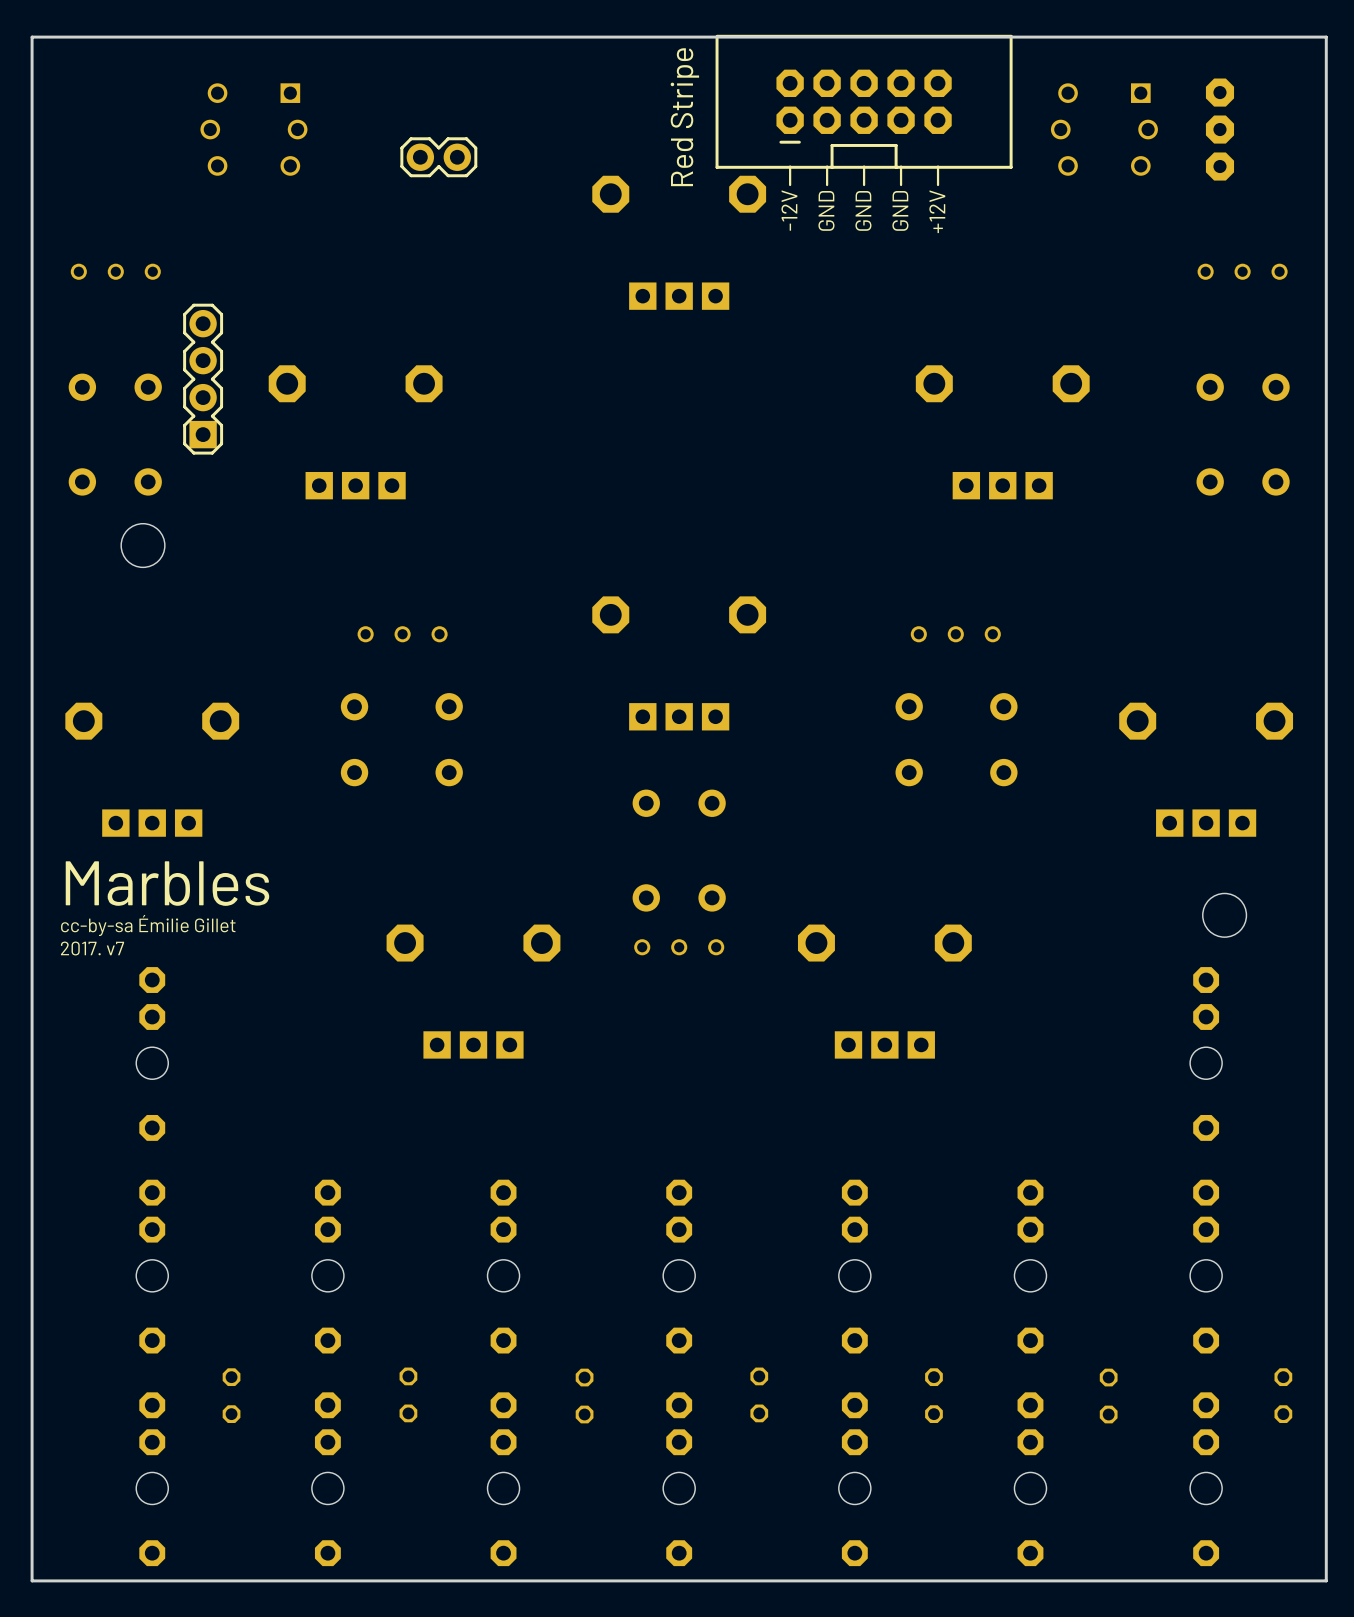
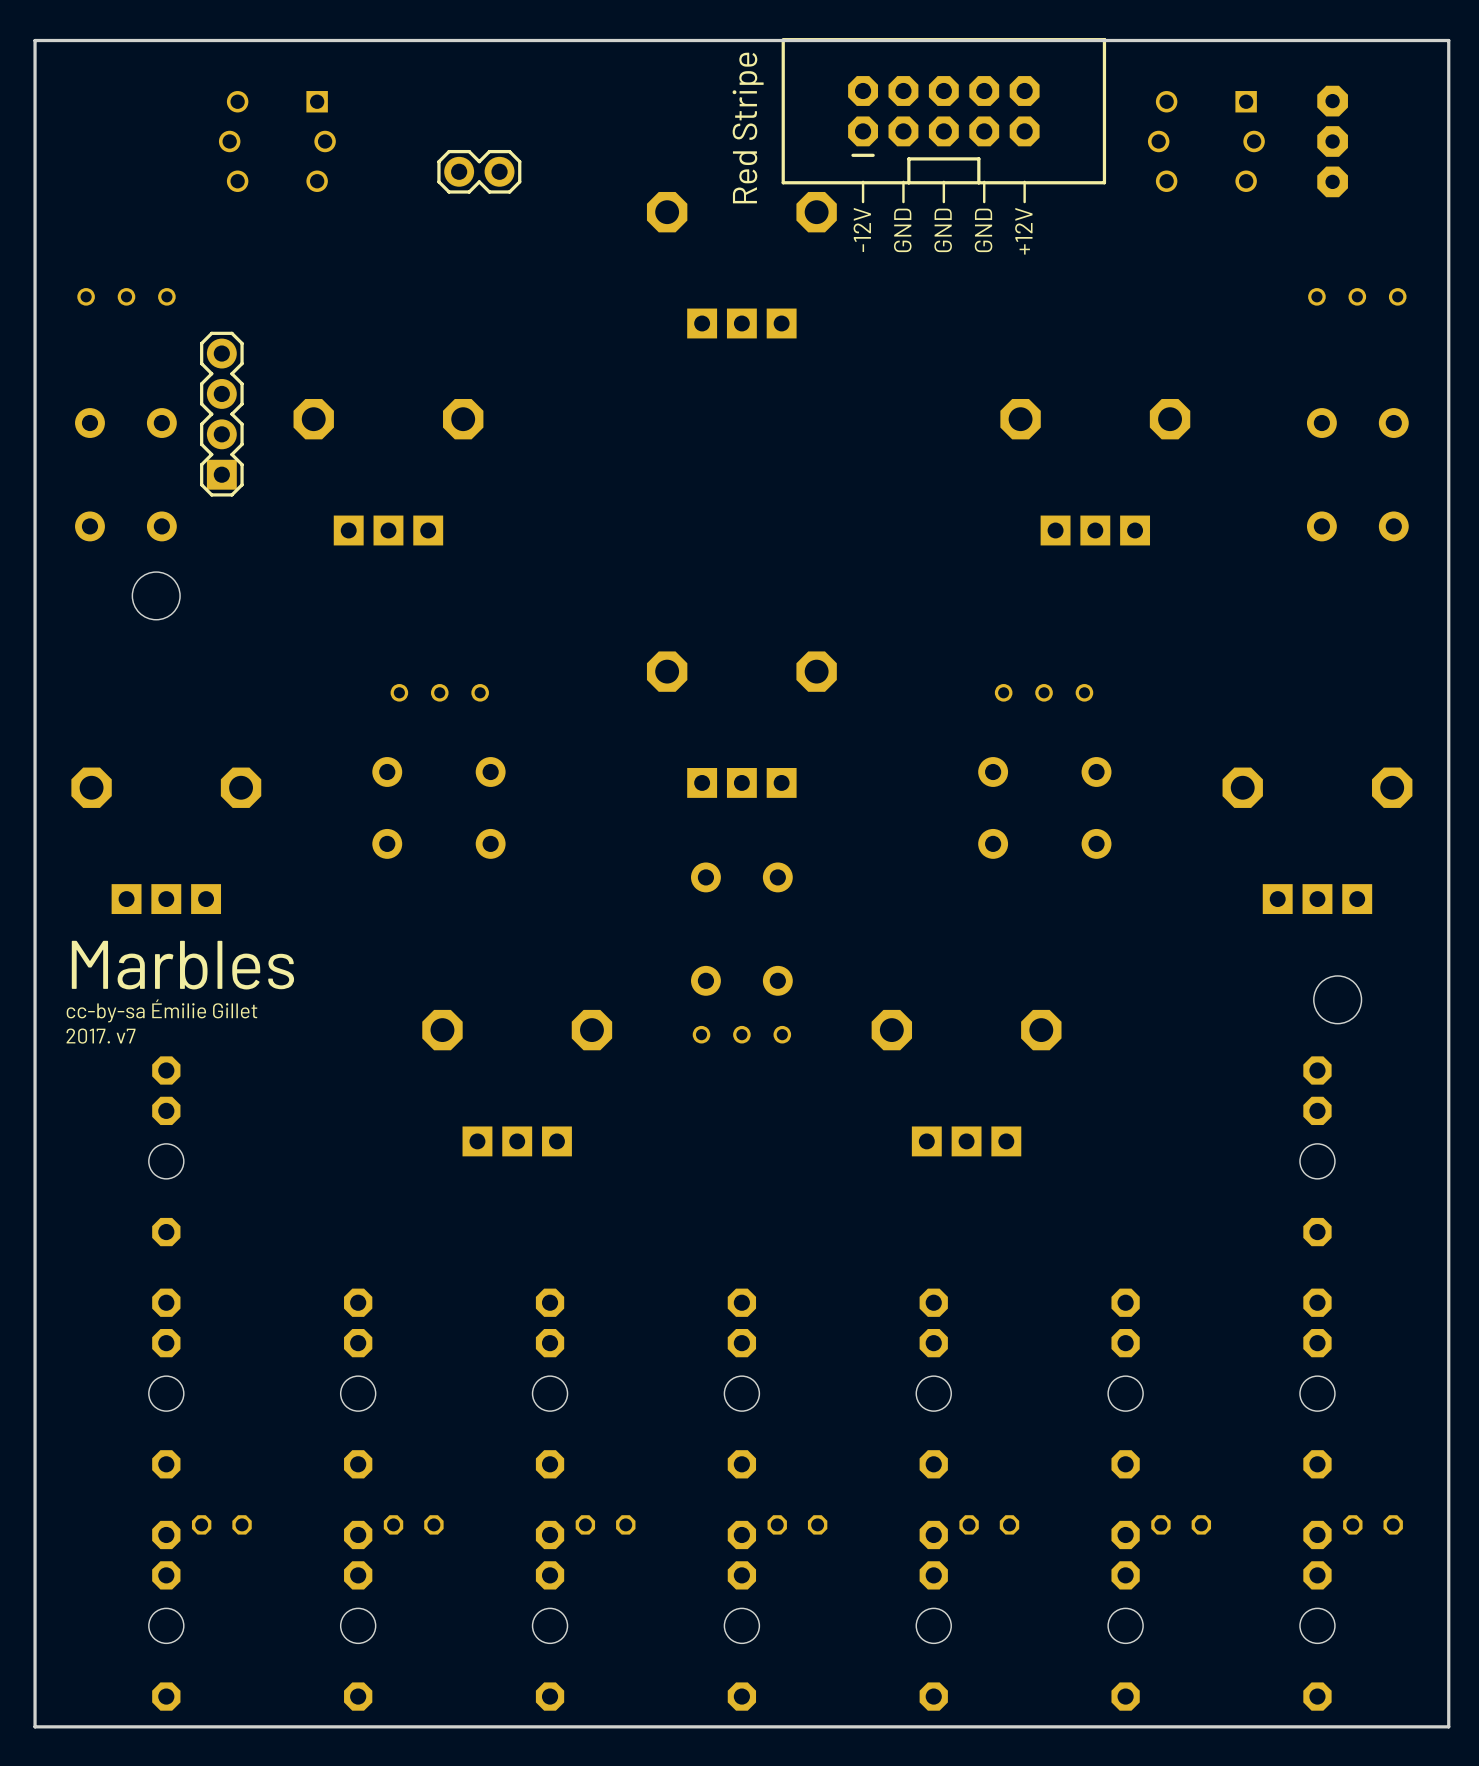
part rotation: 0° (408, 1394) -> 90° clockwise (413, 1524)
part rotation: 0° (759, 1394) -> 90° clockwise (797, 1524)
part rotation: 0° (231, 1395) -> 90° clockwise (221, 1524)
part rotation: 0° (933, 1395) -> 90° clockwise (989, 1524)
part rotation: 0° (1283, 1395) -> 90° clockwise (1373, 1524)
part rotation: 0° (584, 1396) -> 90° clockwise (605, 1524)
part rotation: 0° (1108, 1396) -> 90° clockwise (1181, 1524)

